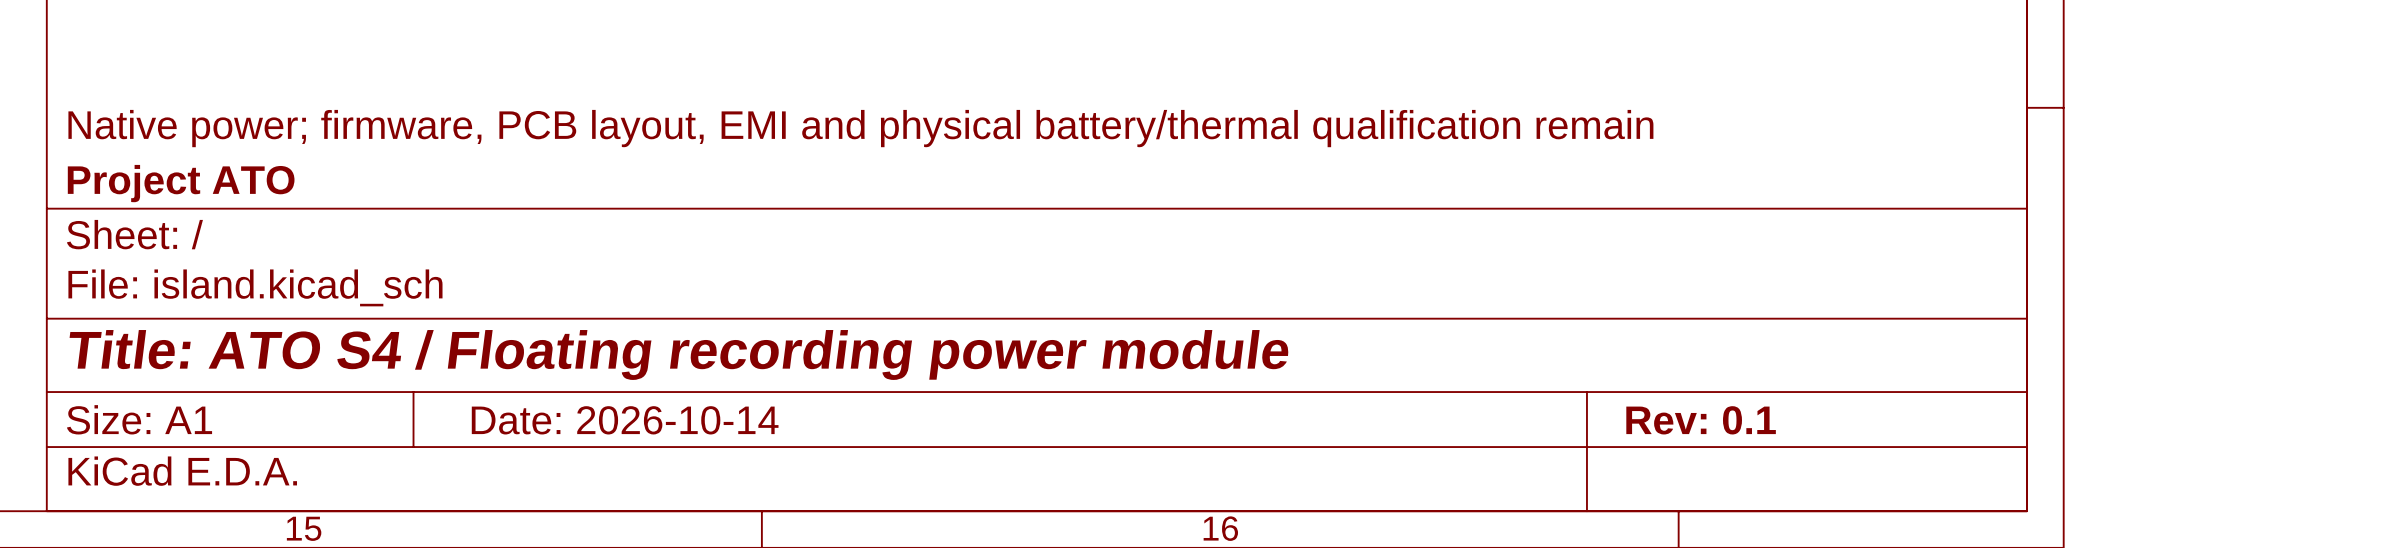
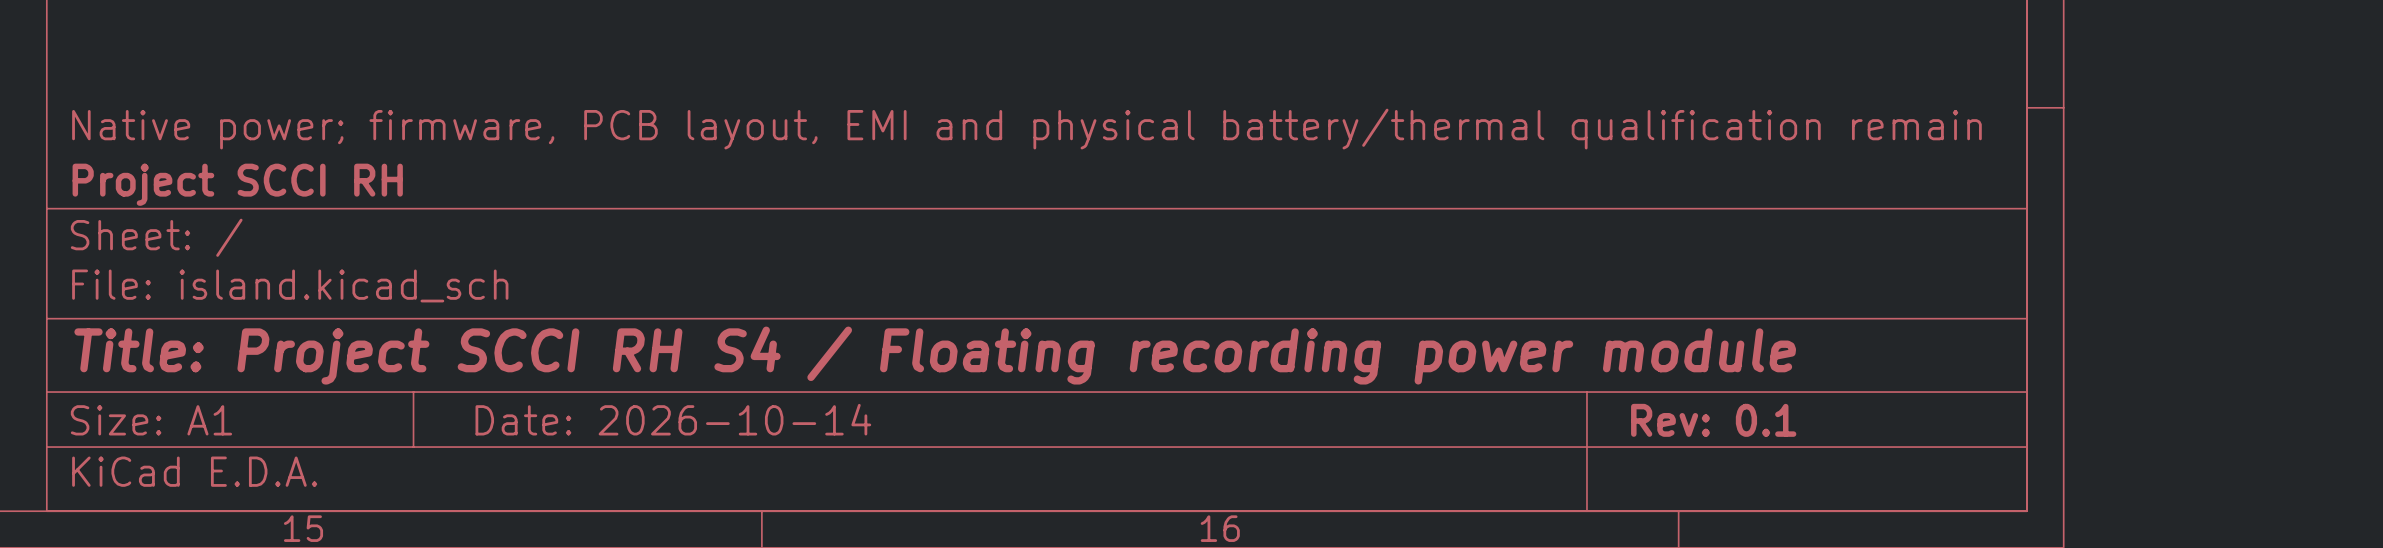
title block: Project ATO (181, 183) -> Project SCCI RH (237, 184)
title block: Title: ATO S4 / Floating recording power module (679, 354) -> Title: Project SCCI RH S4 / Floating recording power module (935, 355)

